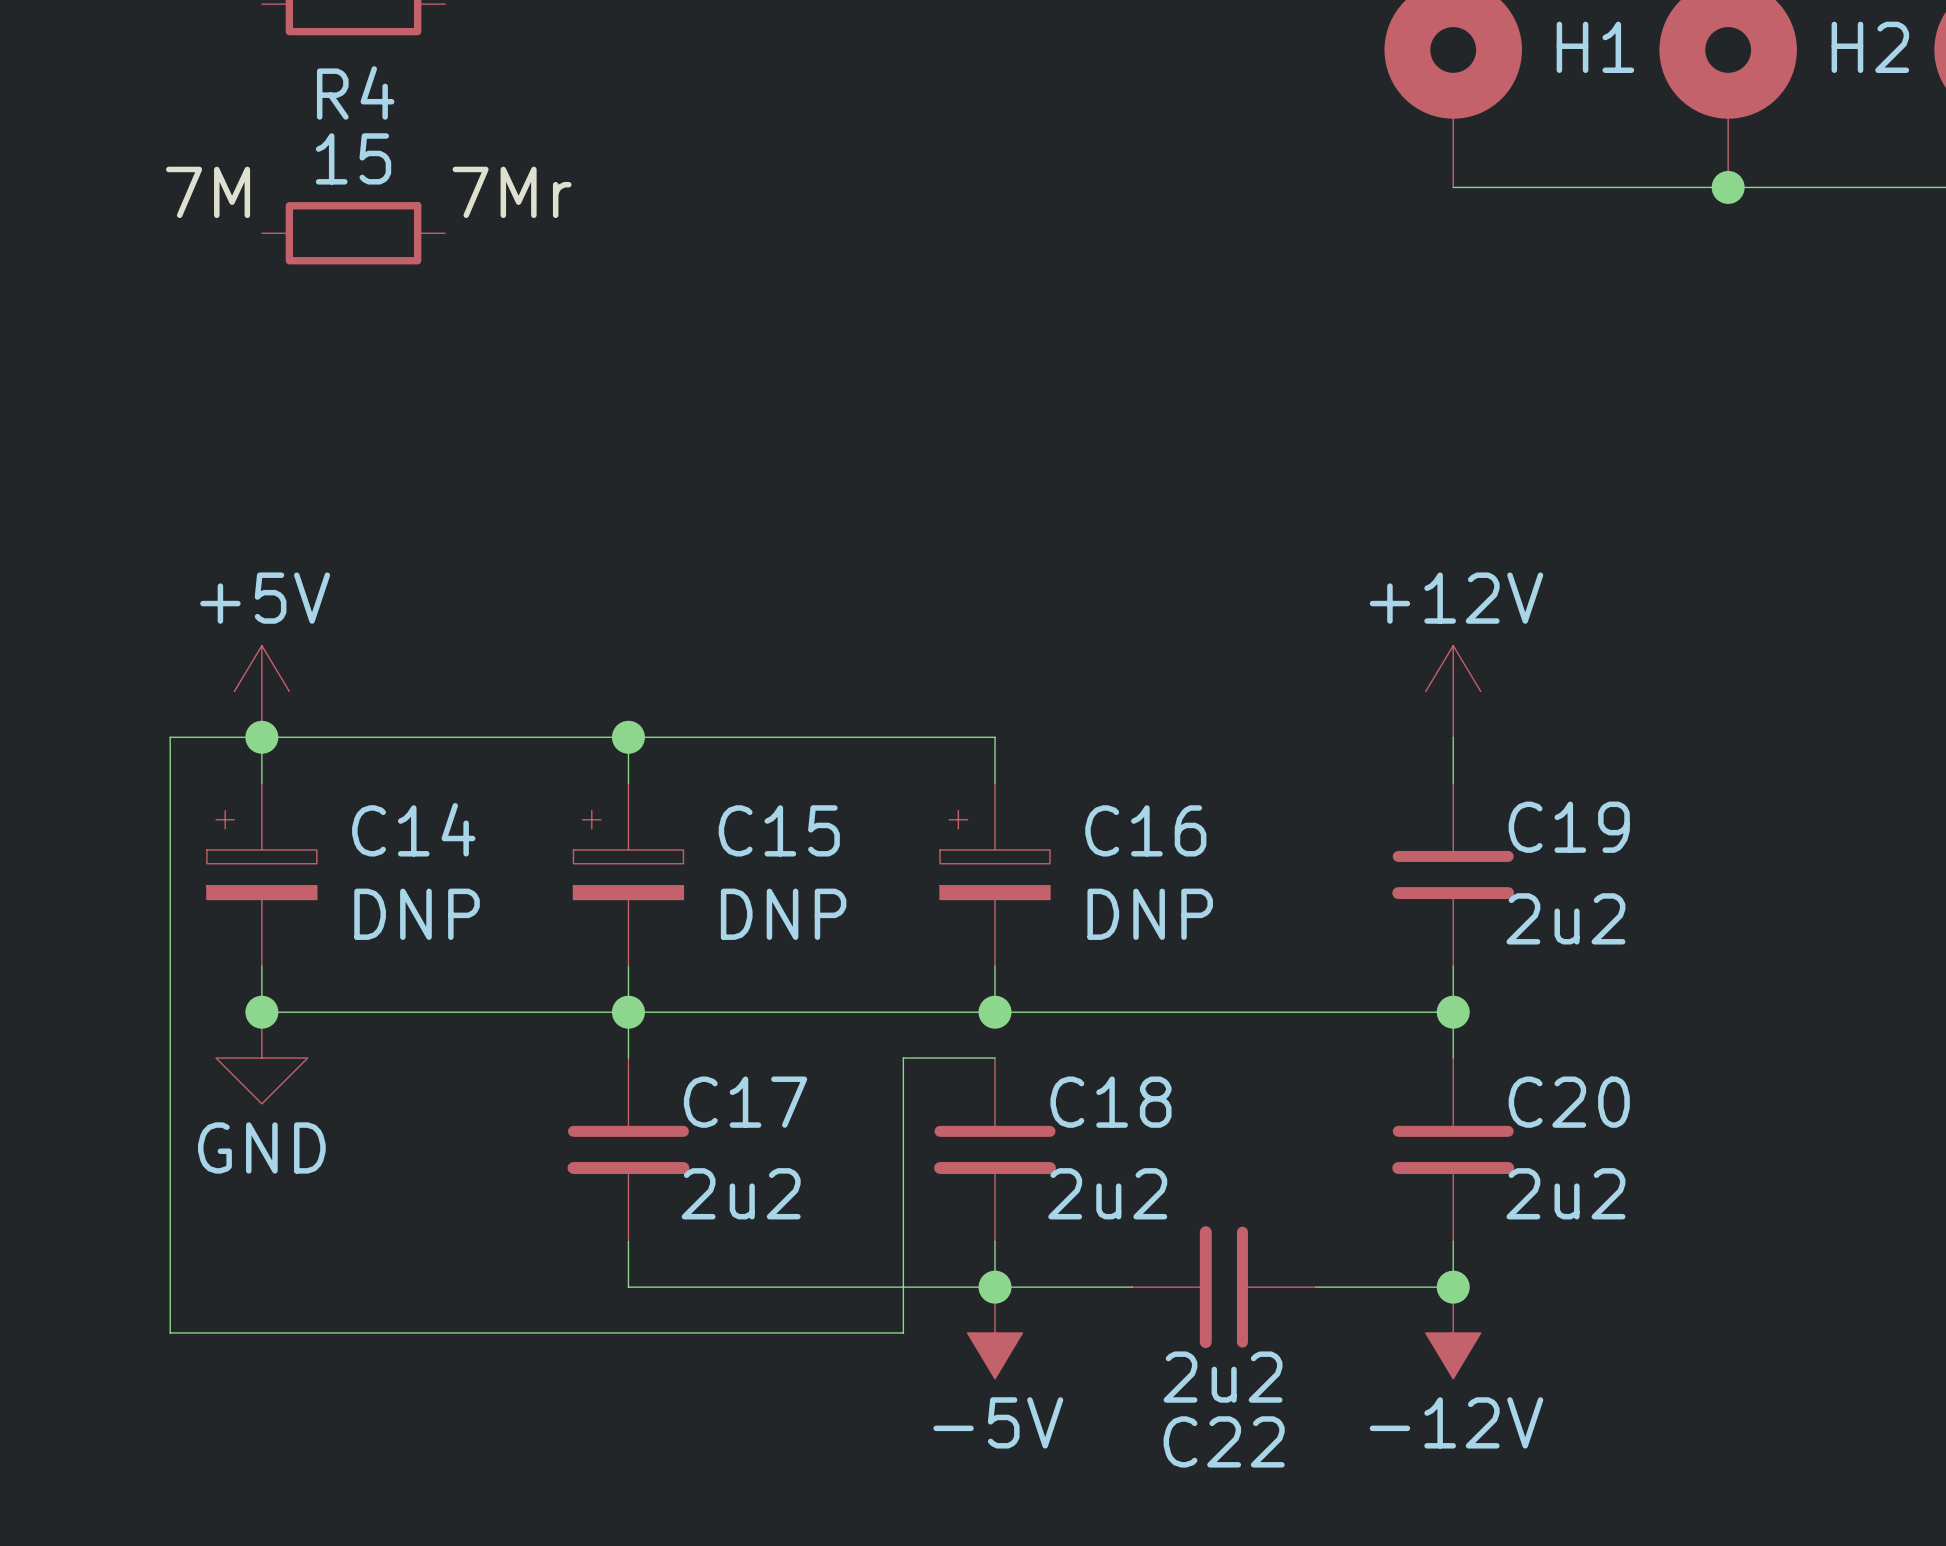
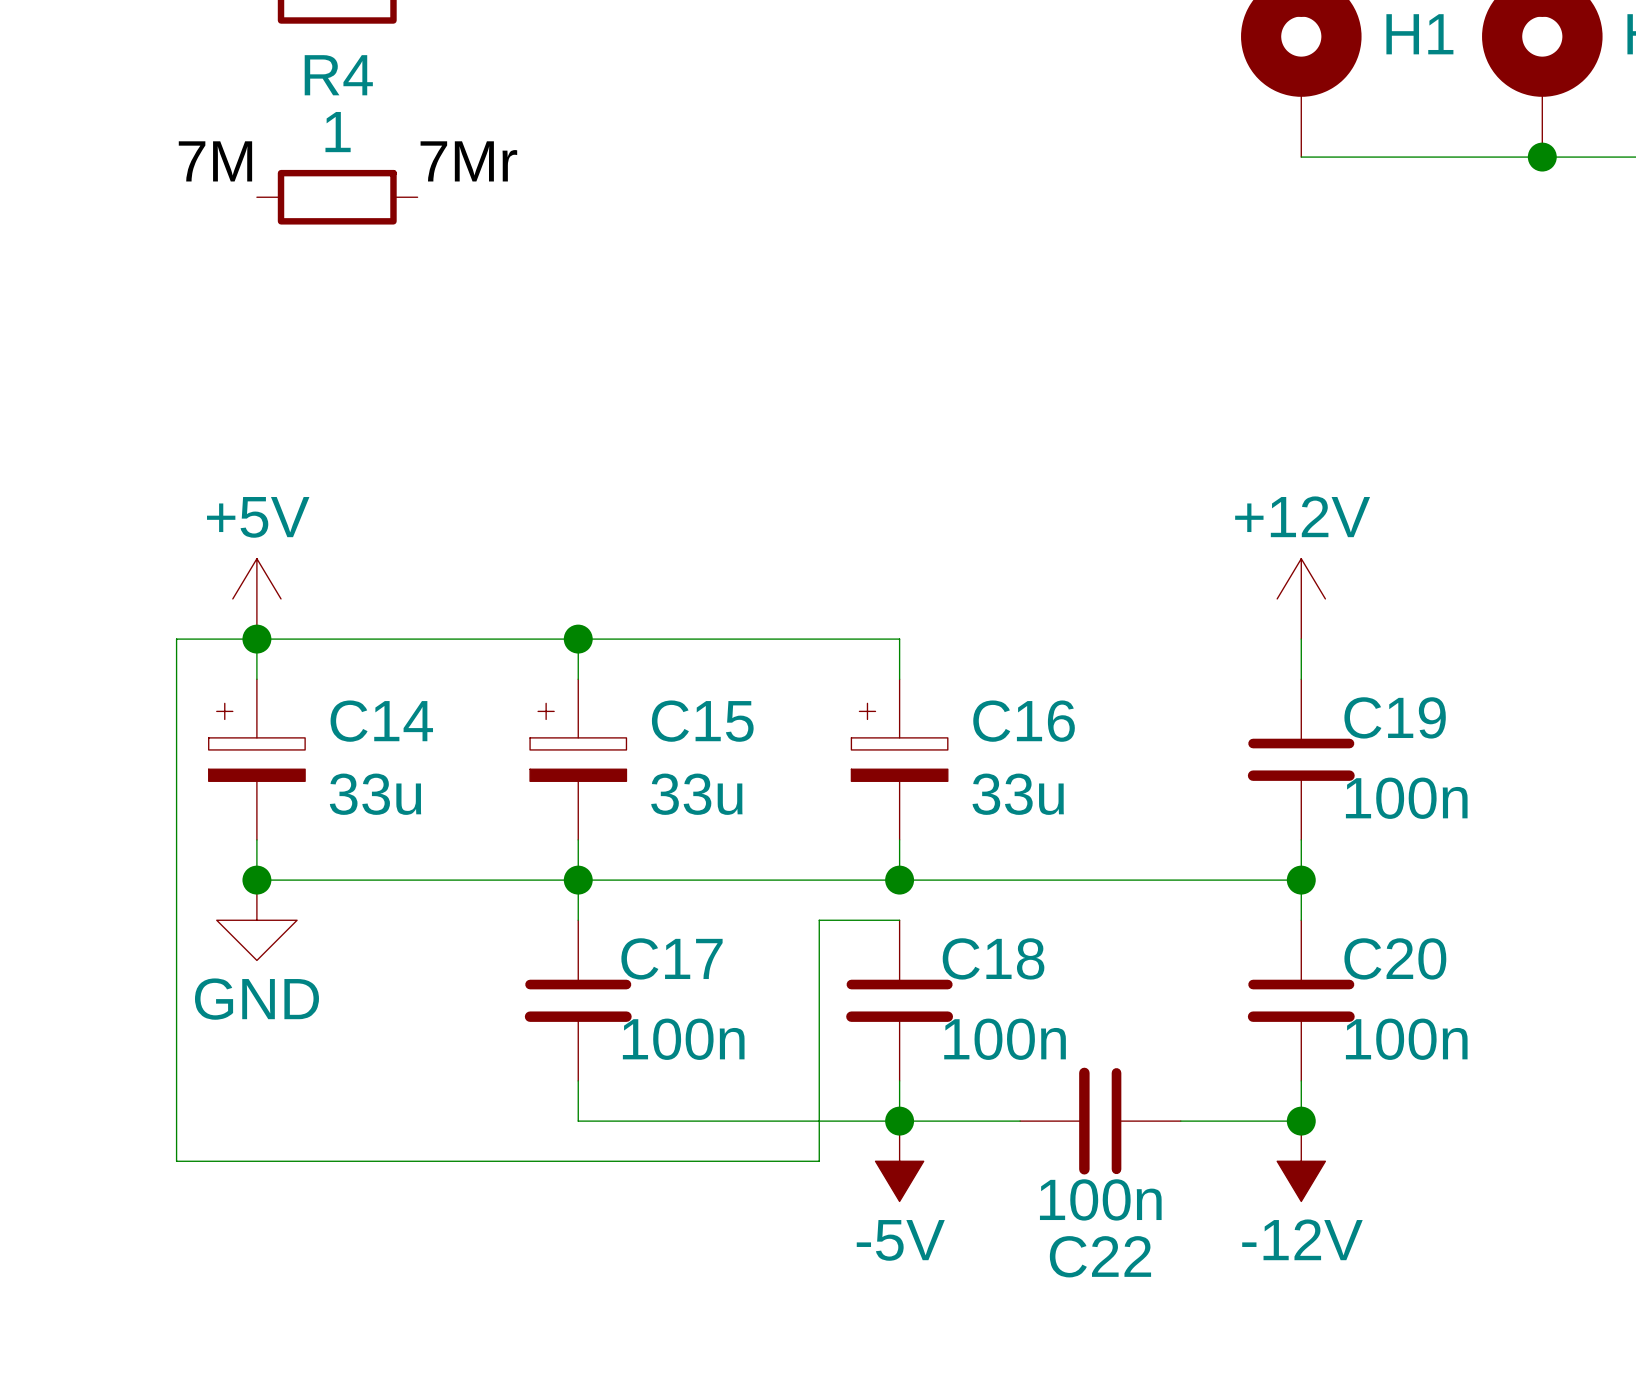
R4 value: 15 (353, 158) -> 1 (338, 132)
C14 value: DNP (417, 914) -> 33u (375, 794)
C15 value: DNP (783, 914) -> 33u (696, 794)
C16 value: DNP (1150, 914) -> 33u (1018, 794)
C19 value: 2u2 (1565, 918) -> 100n (1406, 798)
C17 value: 2u2 (741, 1193) -> 100n (683, 1039)
C18 value: 2u2 (1107, 1193) -> 100n (1005, 1039)
C20 value: 2u2 (1565, 1193) -> 100n (1406, 1039)
C22 value: 2u2 (1223, 1377) -> 100n (1100, 1199)

